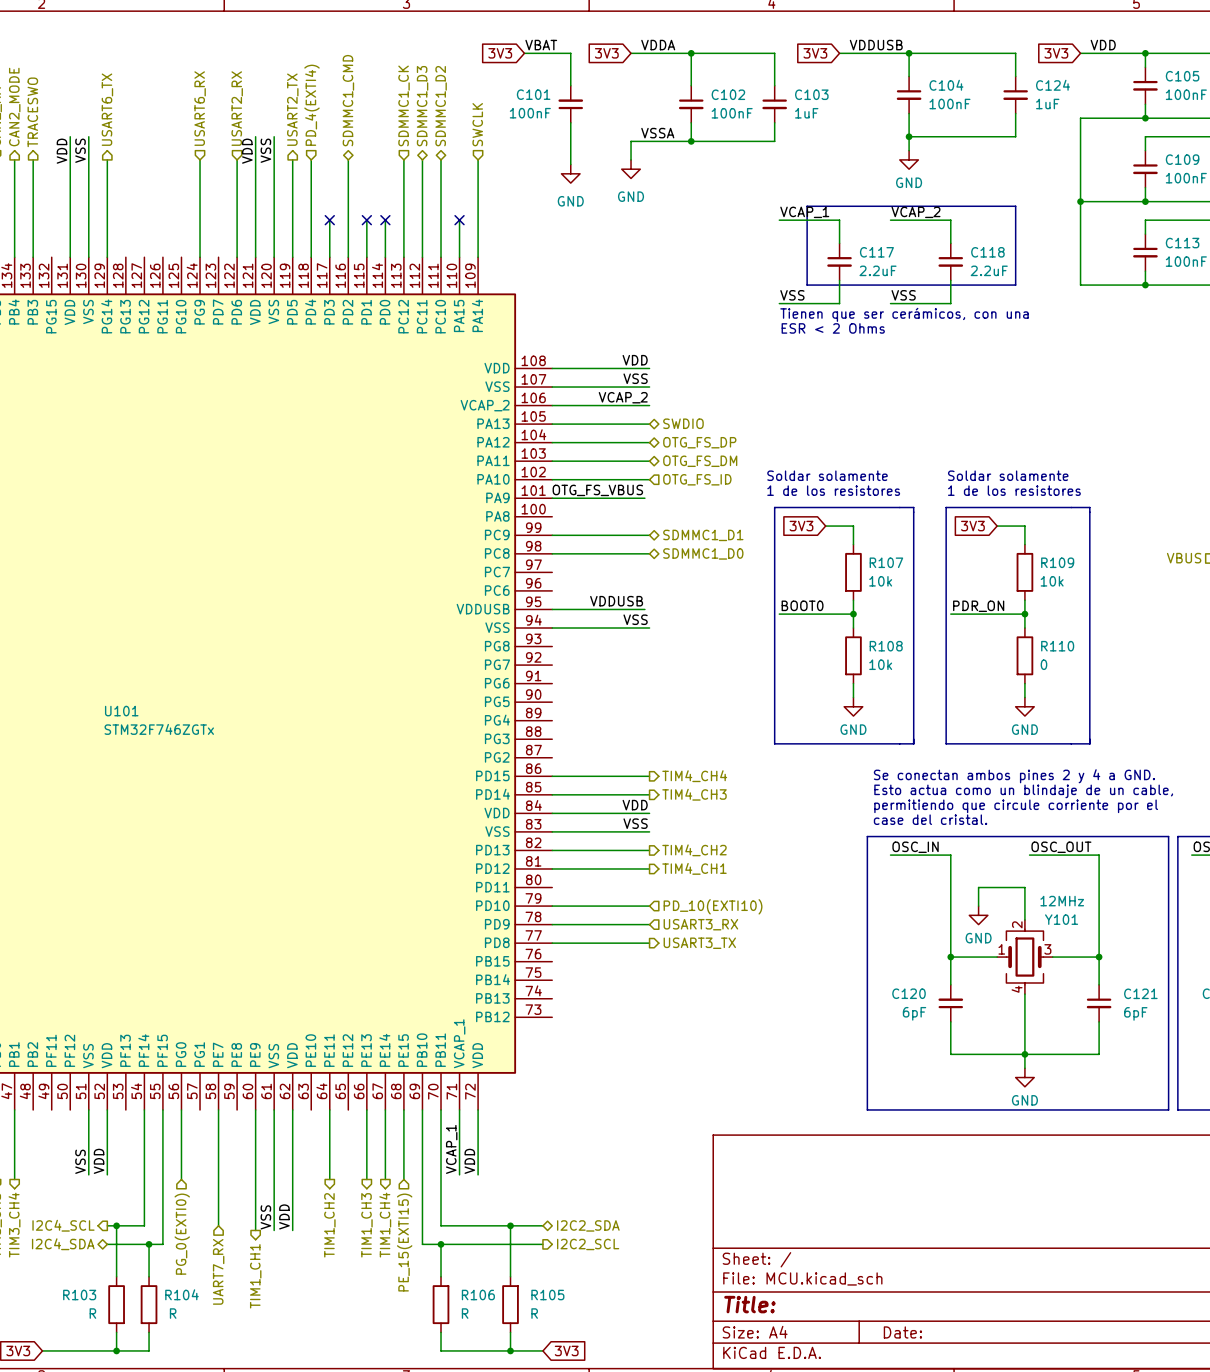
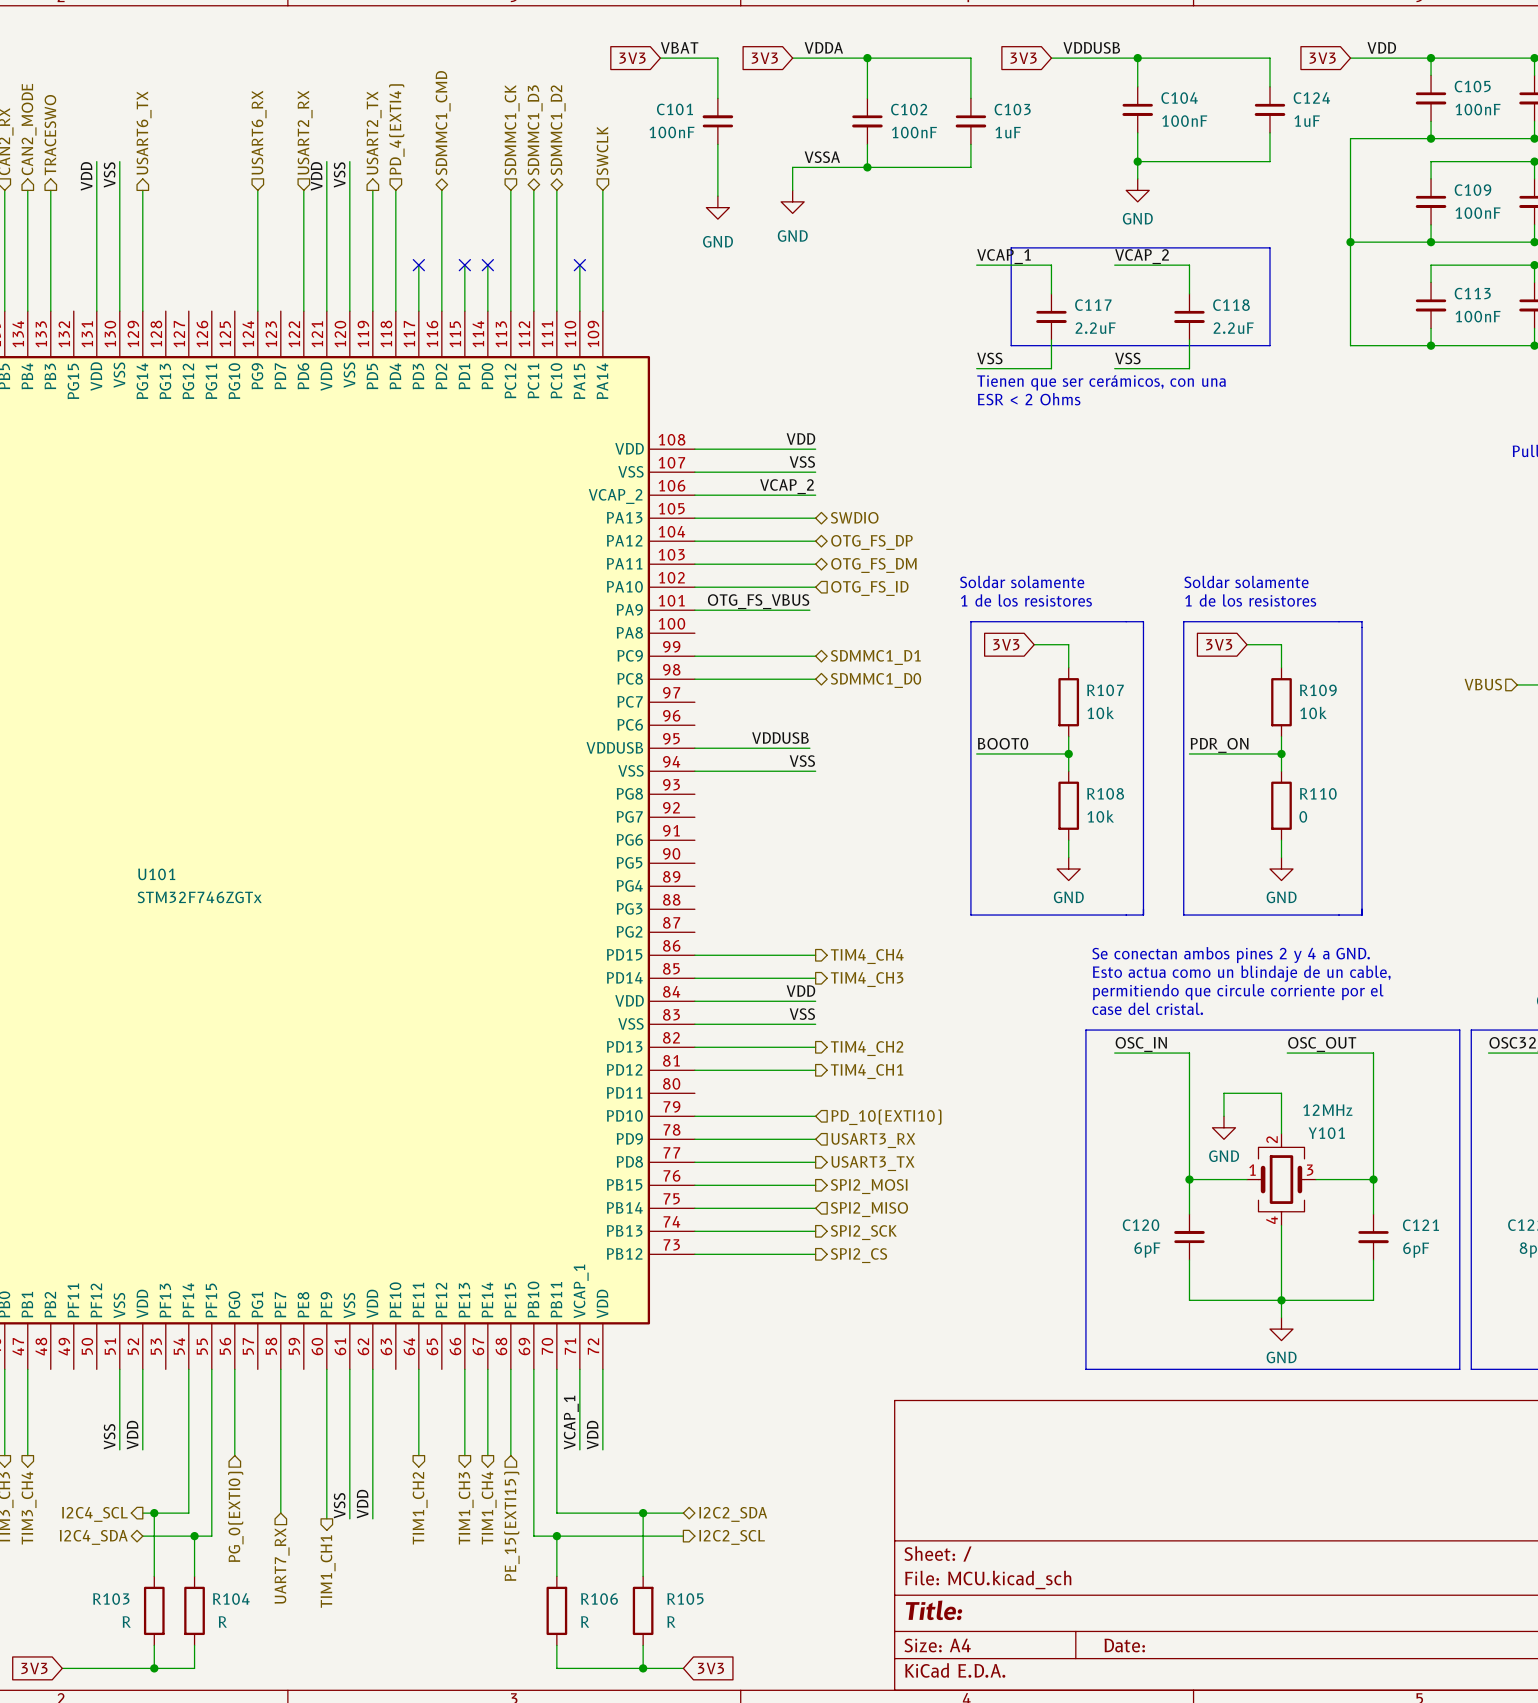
wire: none -> (694, 1185) (815, 1185)
hierarchical label: none -> SPI2_MOSI (869, 1186)
wire: none -> (694, 1208) (815, 1208)
hierarchical label: none -> SPI2_MISO (869, 1209)
wire: none -> (694, 1231) (815, 1231)
hierarchical label: none -> SPI2_SCK (863, 1232)
wire: none -> (694, 1254) (815, 1254)
hierarchical label: none -> SPI2_CS (858, 1255)

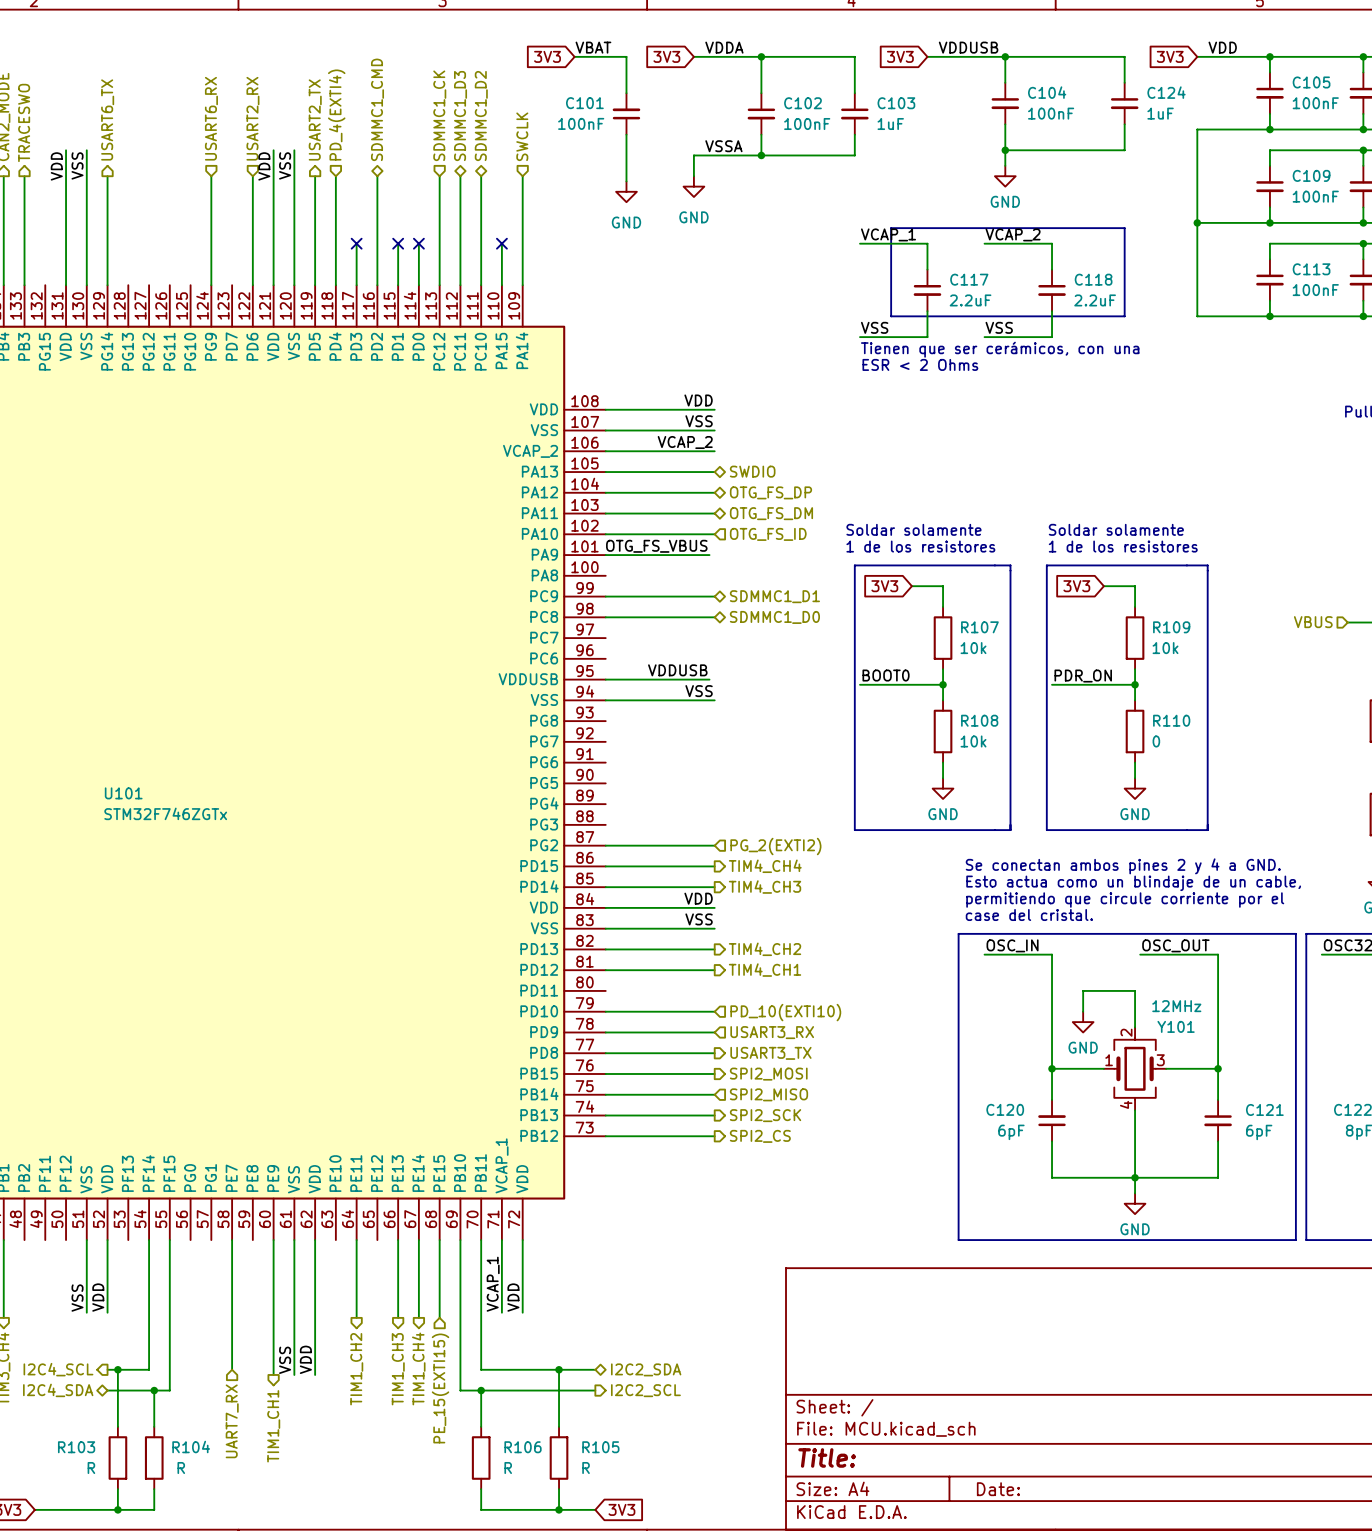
wire: none -> (605, 845) (714, 845)
hierarchical label: none -> PG_2(EXTI2) (775, 846)
wire: (234, 1369) (234, 1455) -> none
hierarchical label: PG_0(EXTI0) (235, 1516) -> none

